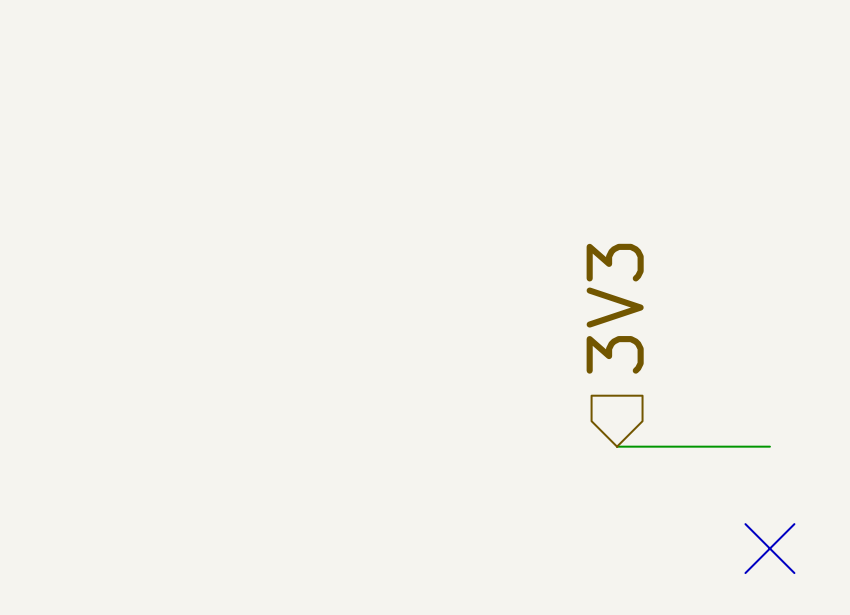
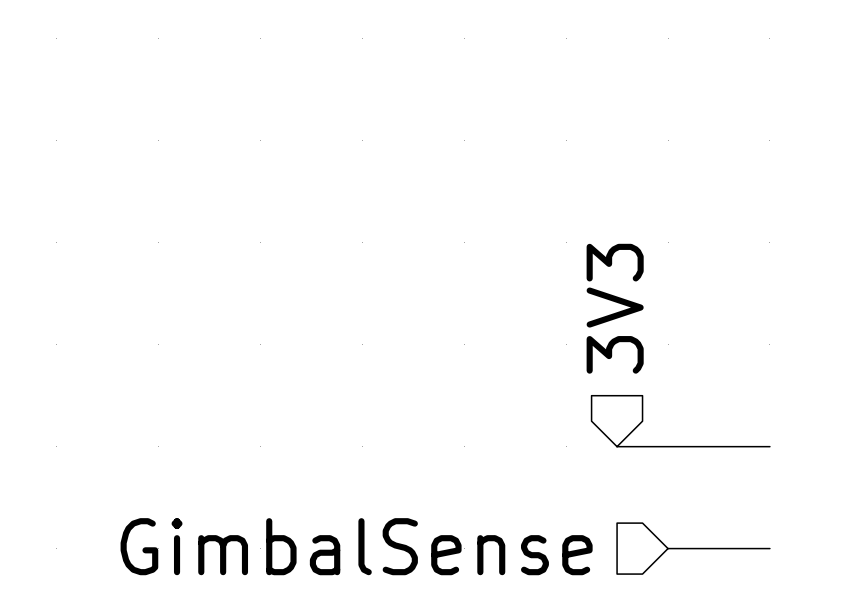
hierarchical label: none -> GimbalSense (356, 546)
wire: none -> (668, 548) (769, 548)
no-connect mark: (769, 548) -> none

